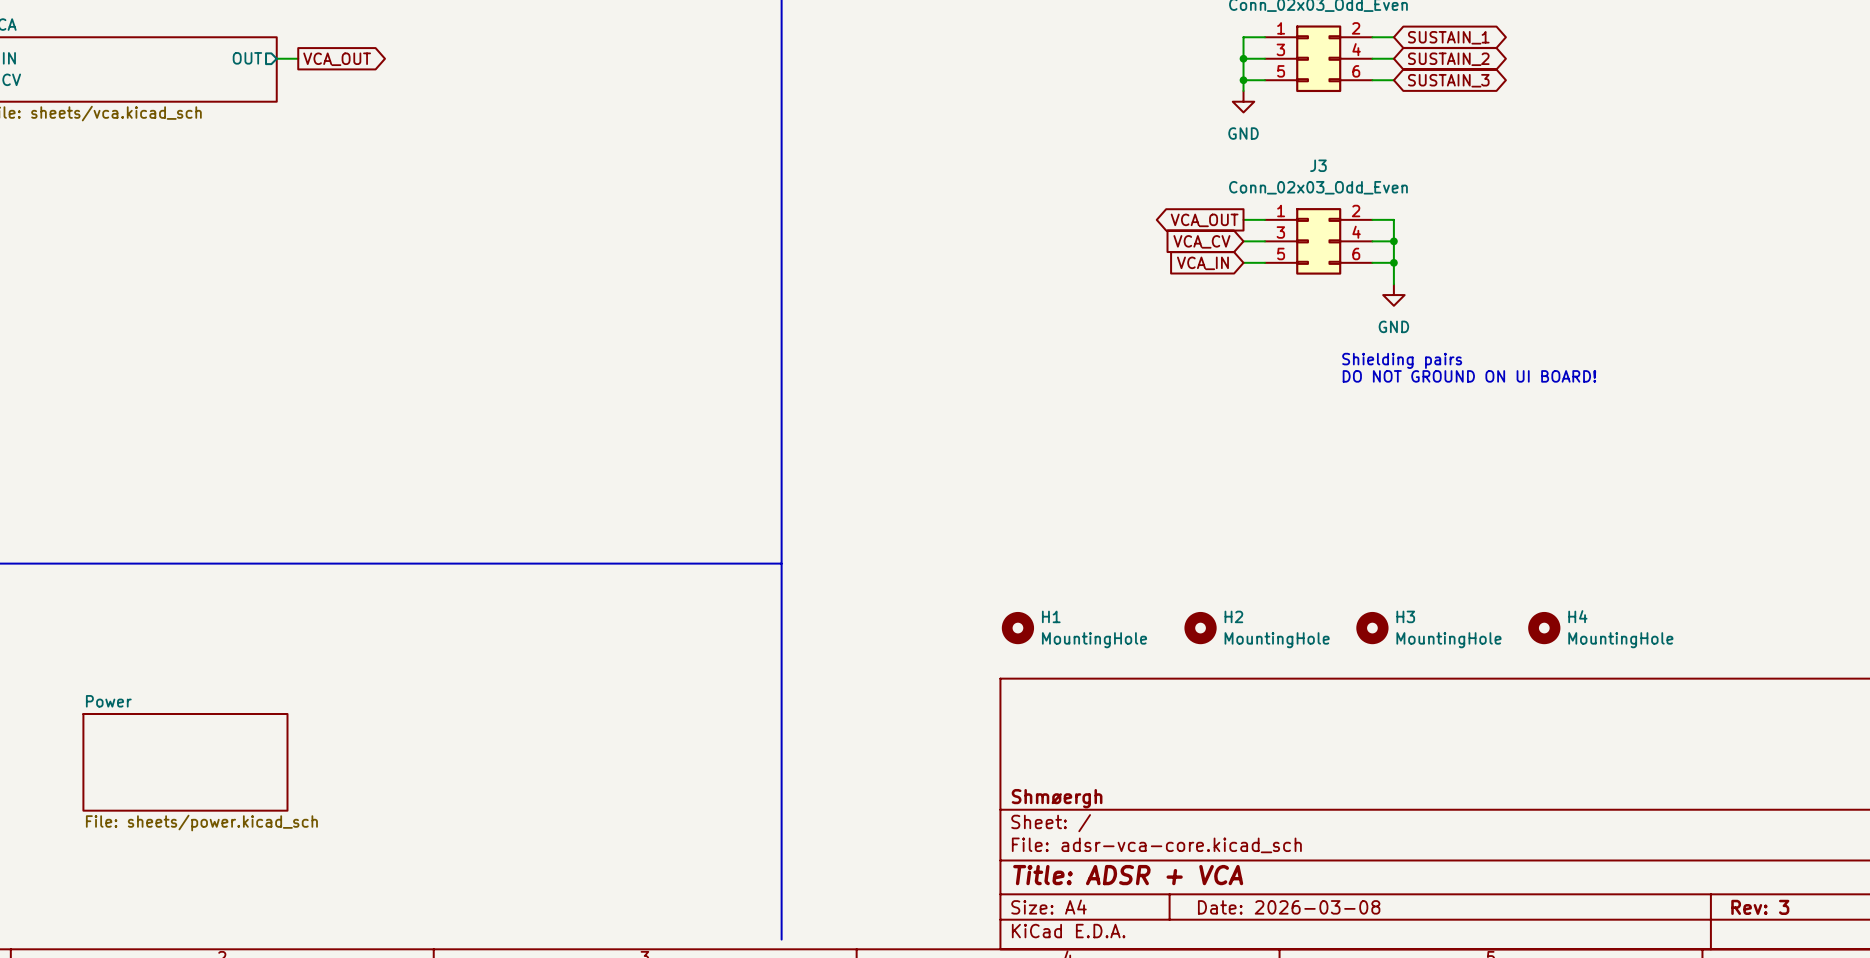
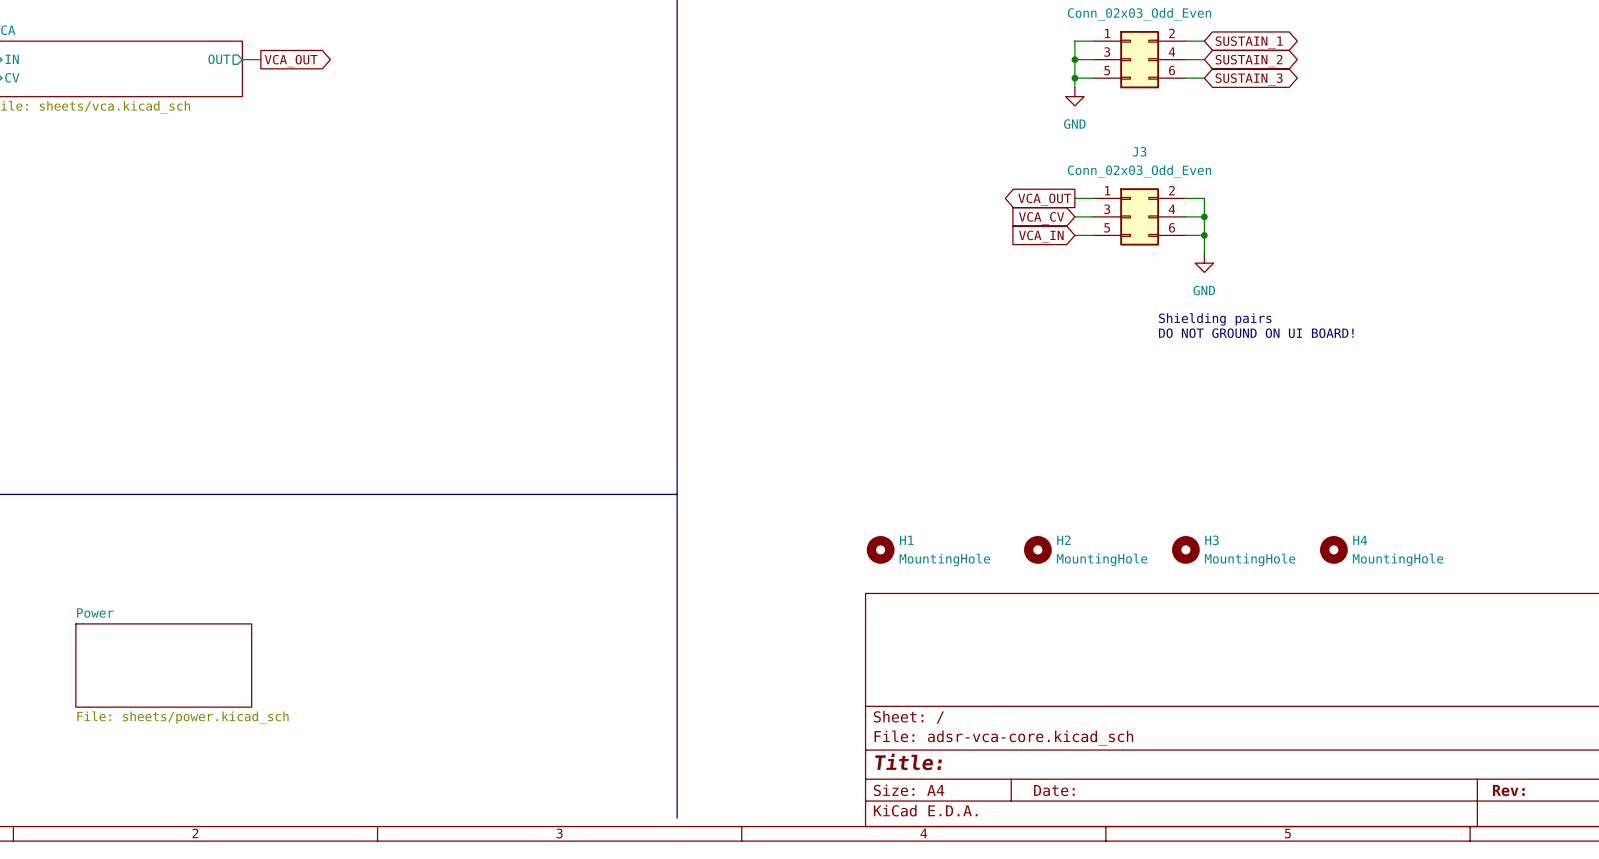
title block: Shmøergh (1057, 798) -> none
title block: Title: ADSR + VCA (1128, 875) -> Title: (908, 761)
title block: Date: 2026-03-08 (1289, 907) -> Date: (1054, 790)
title block: Rev: 3 (1760, 907) -> Rev: (1508, 790)

